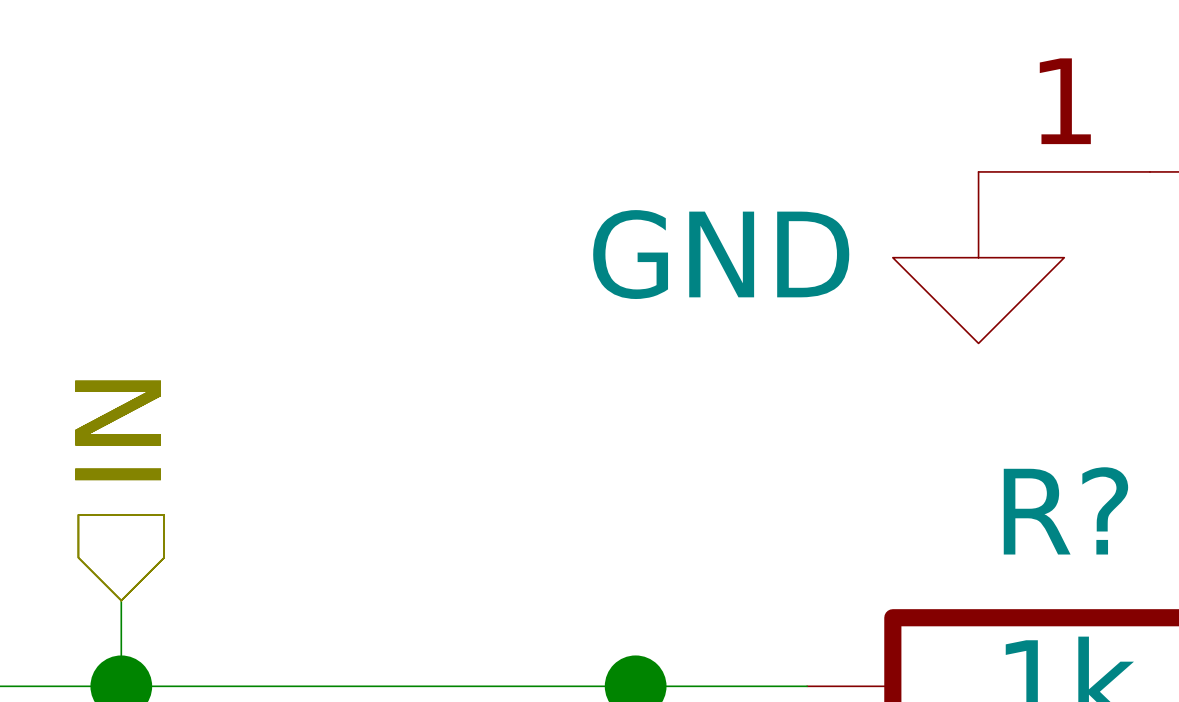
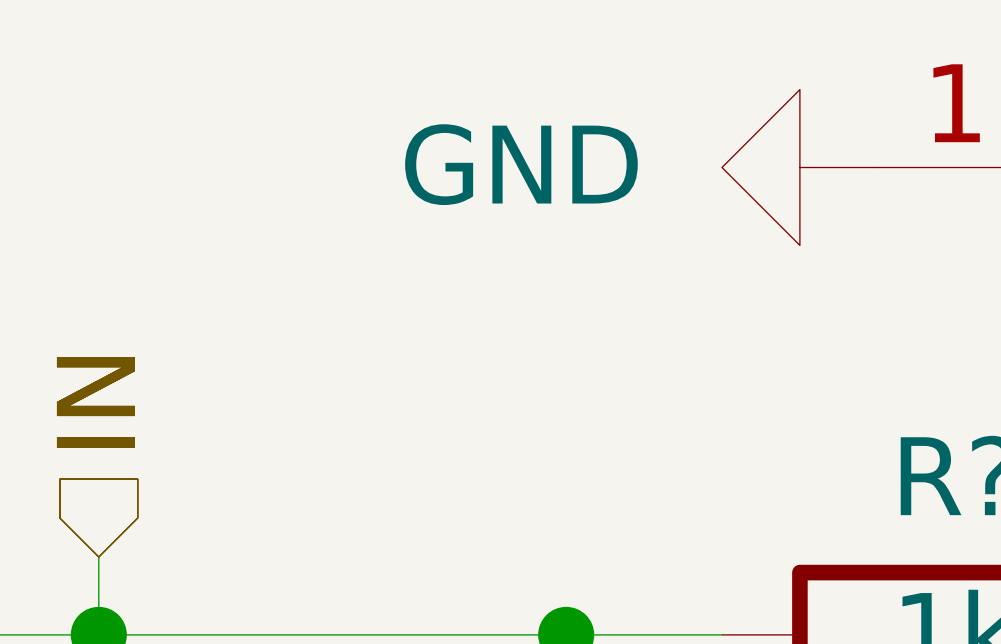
power symbol rotation: 0° (978, 257) -> 90° clockwise (799, 167)
power symbol position: GND (978, 257) -> GND (799, 167)

